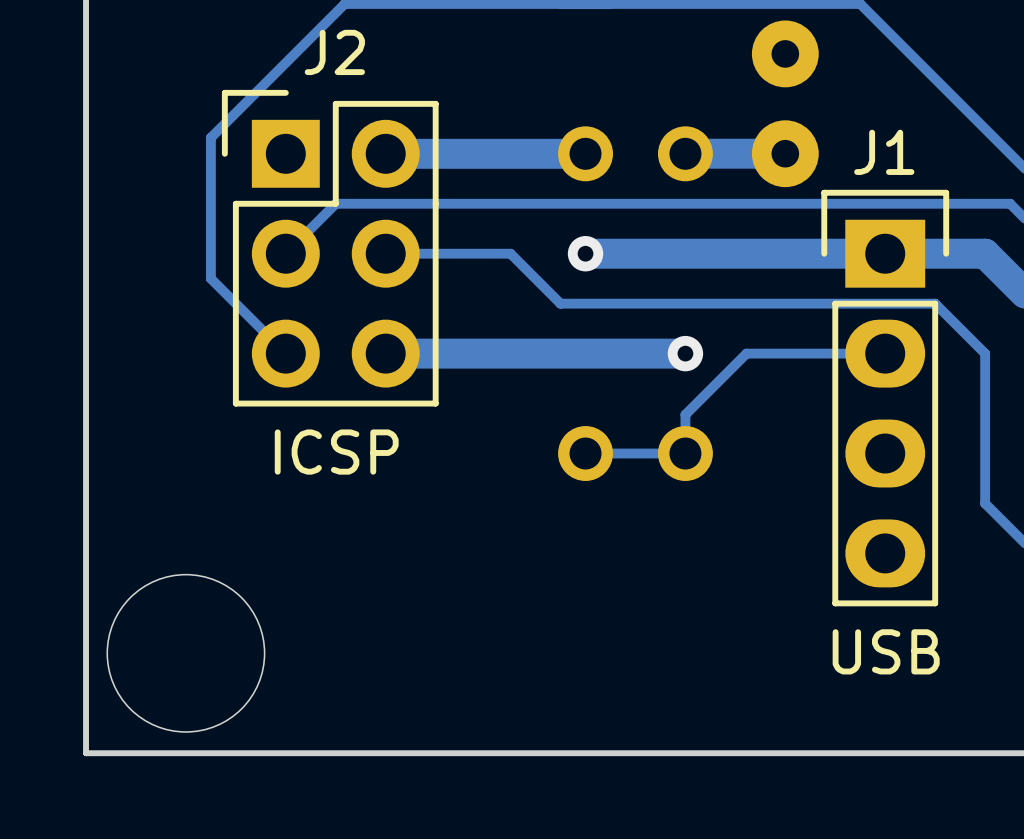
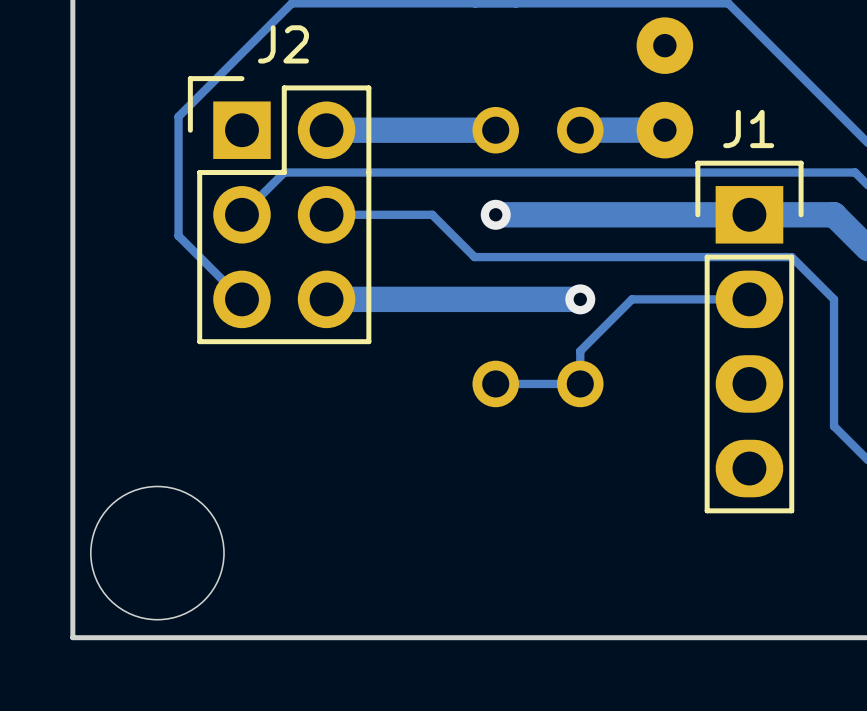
J2 value: ICSP (336, 452) -> none
J1 value: USB (886, 651) -> none

